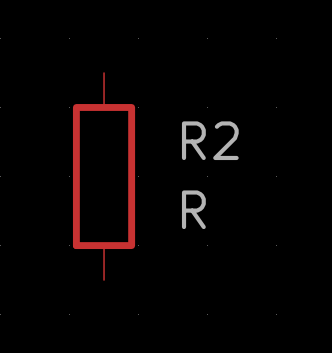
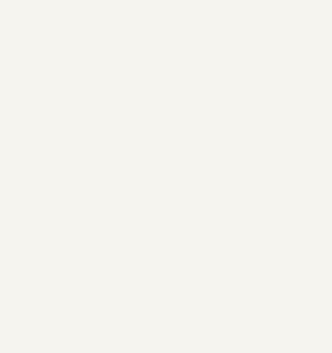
R2: R (104, 176) -> none

